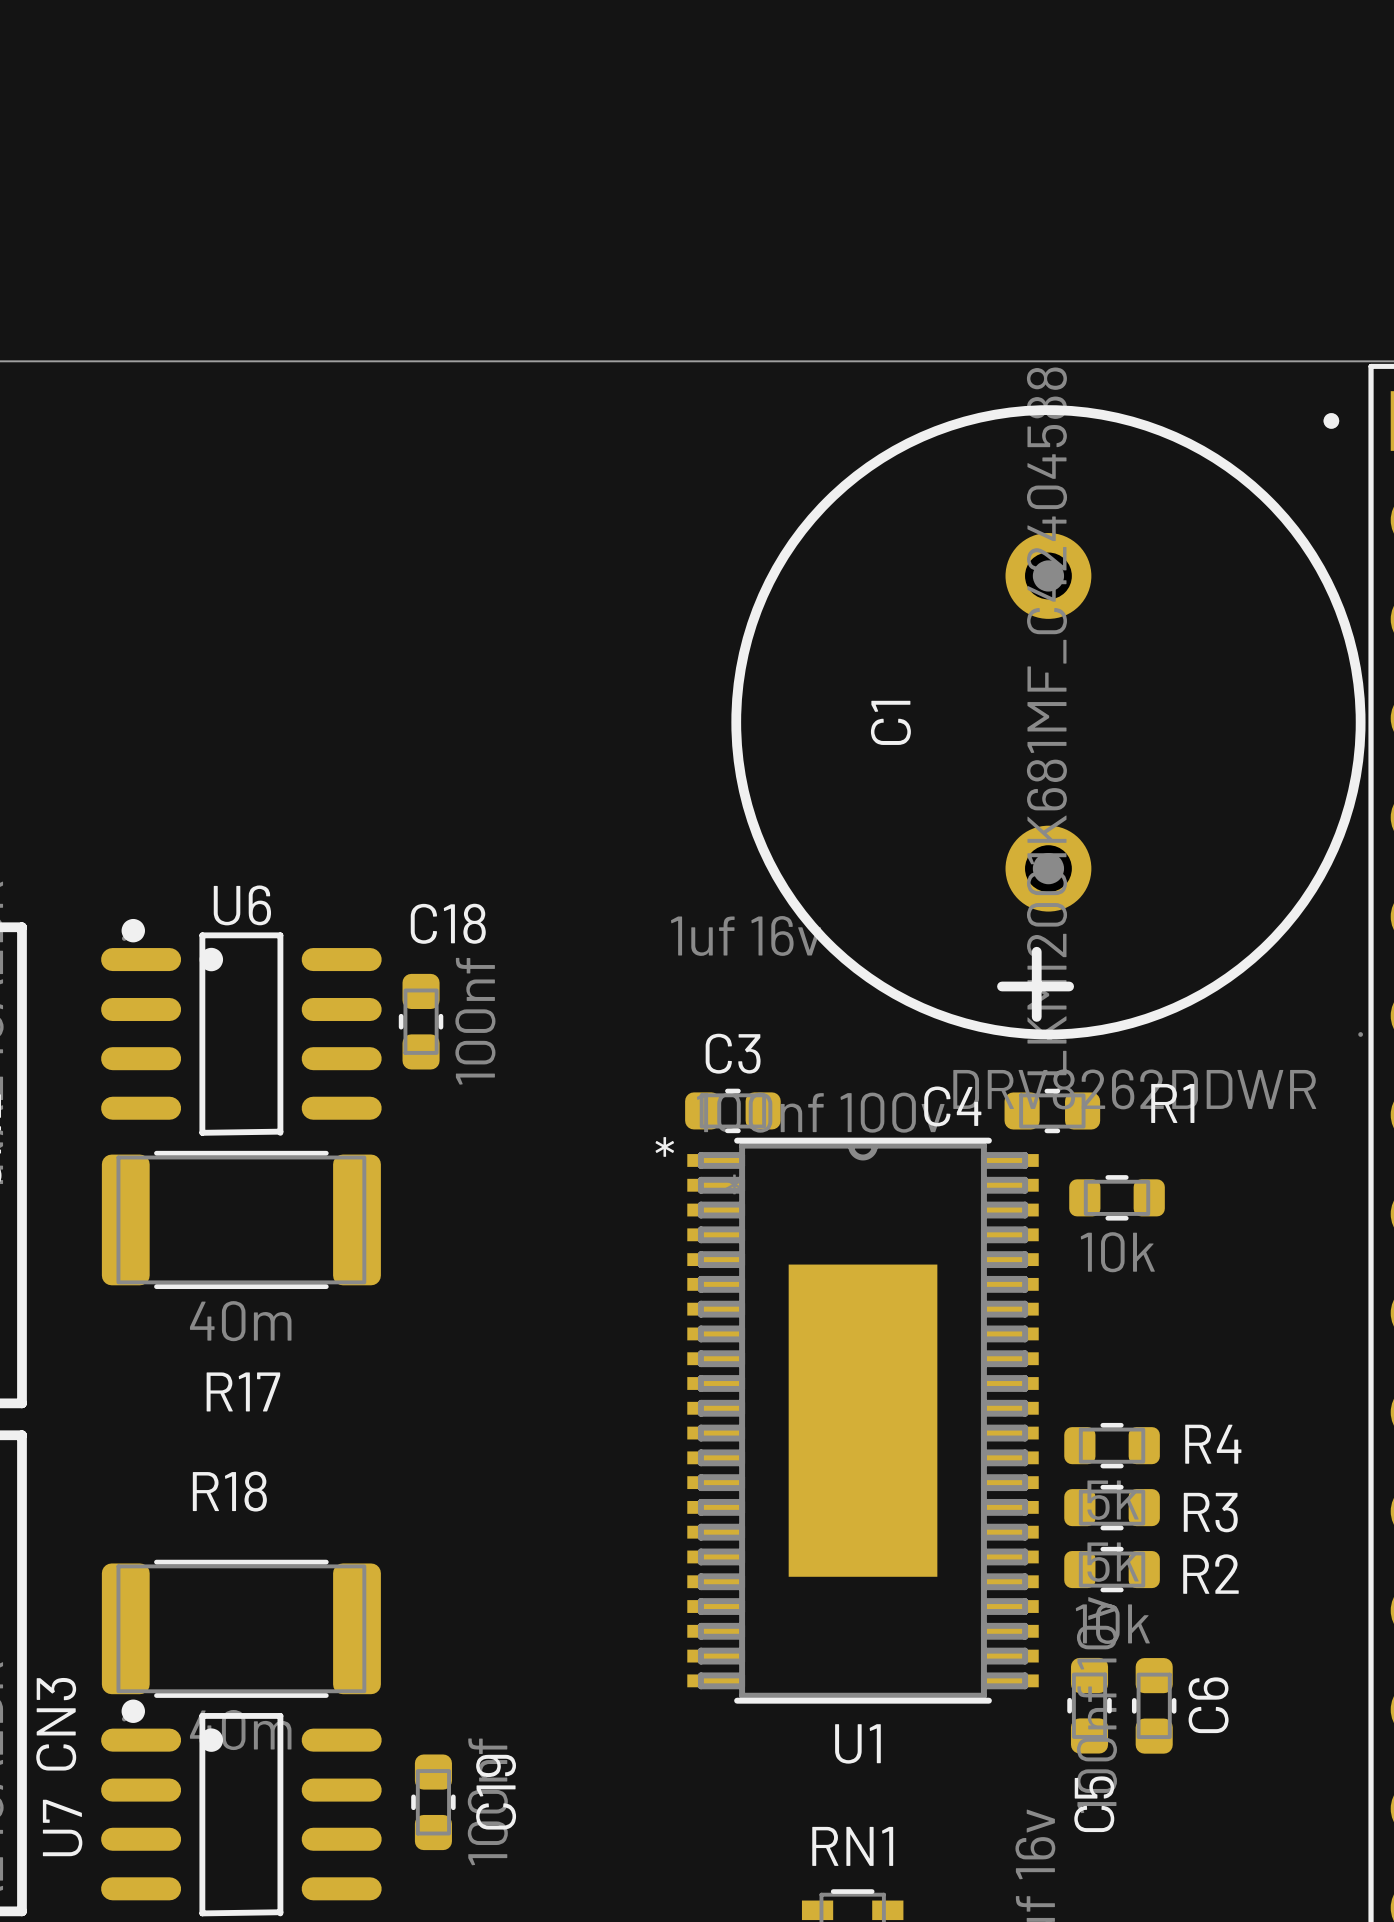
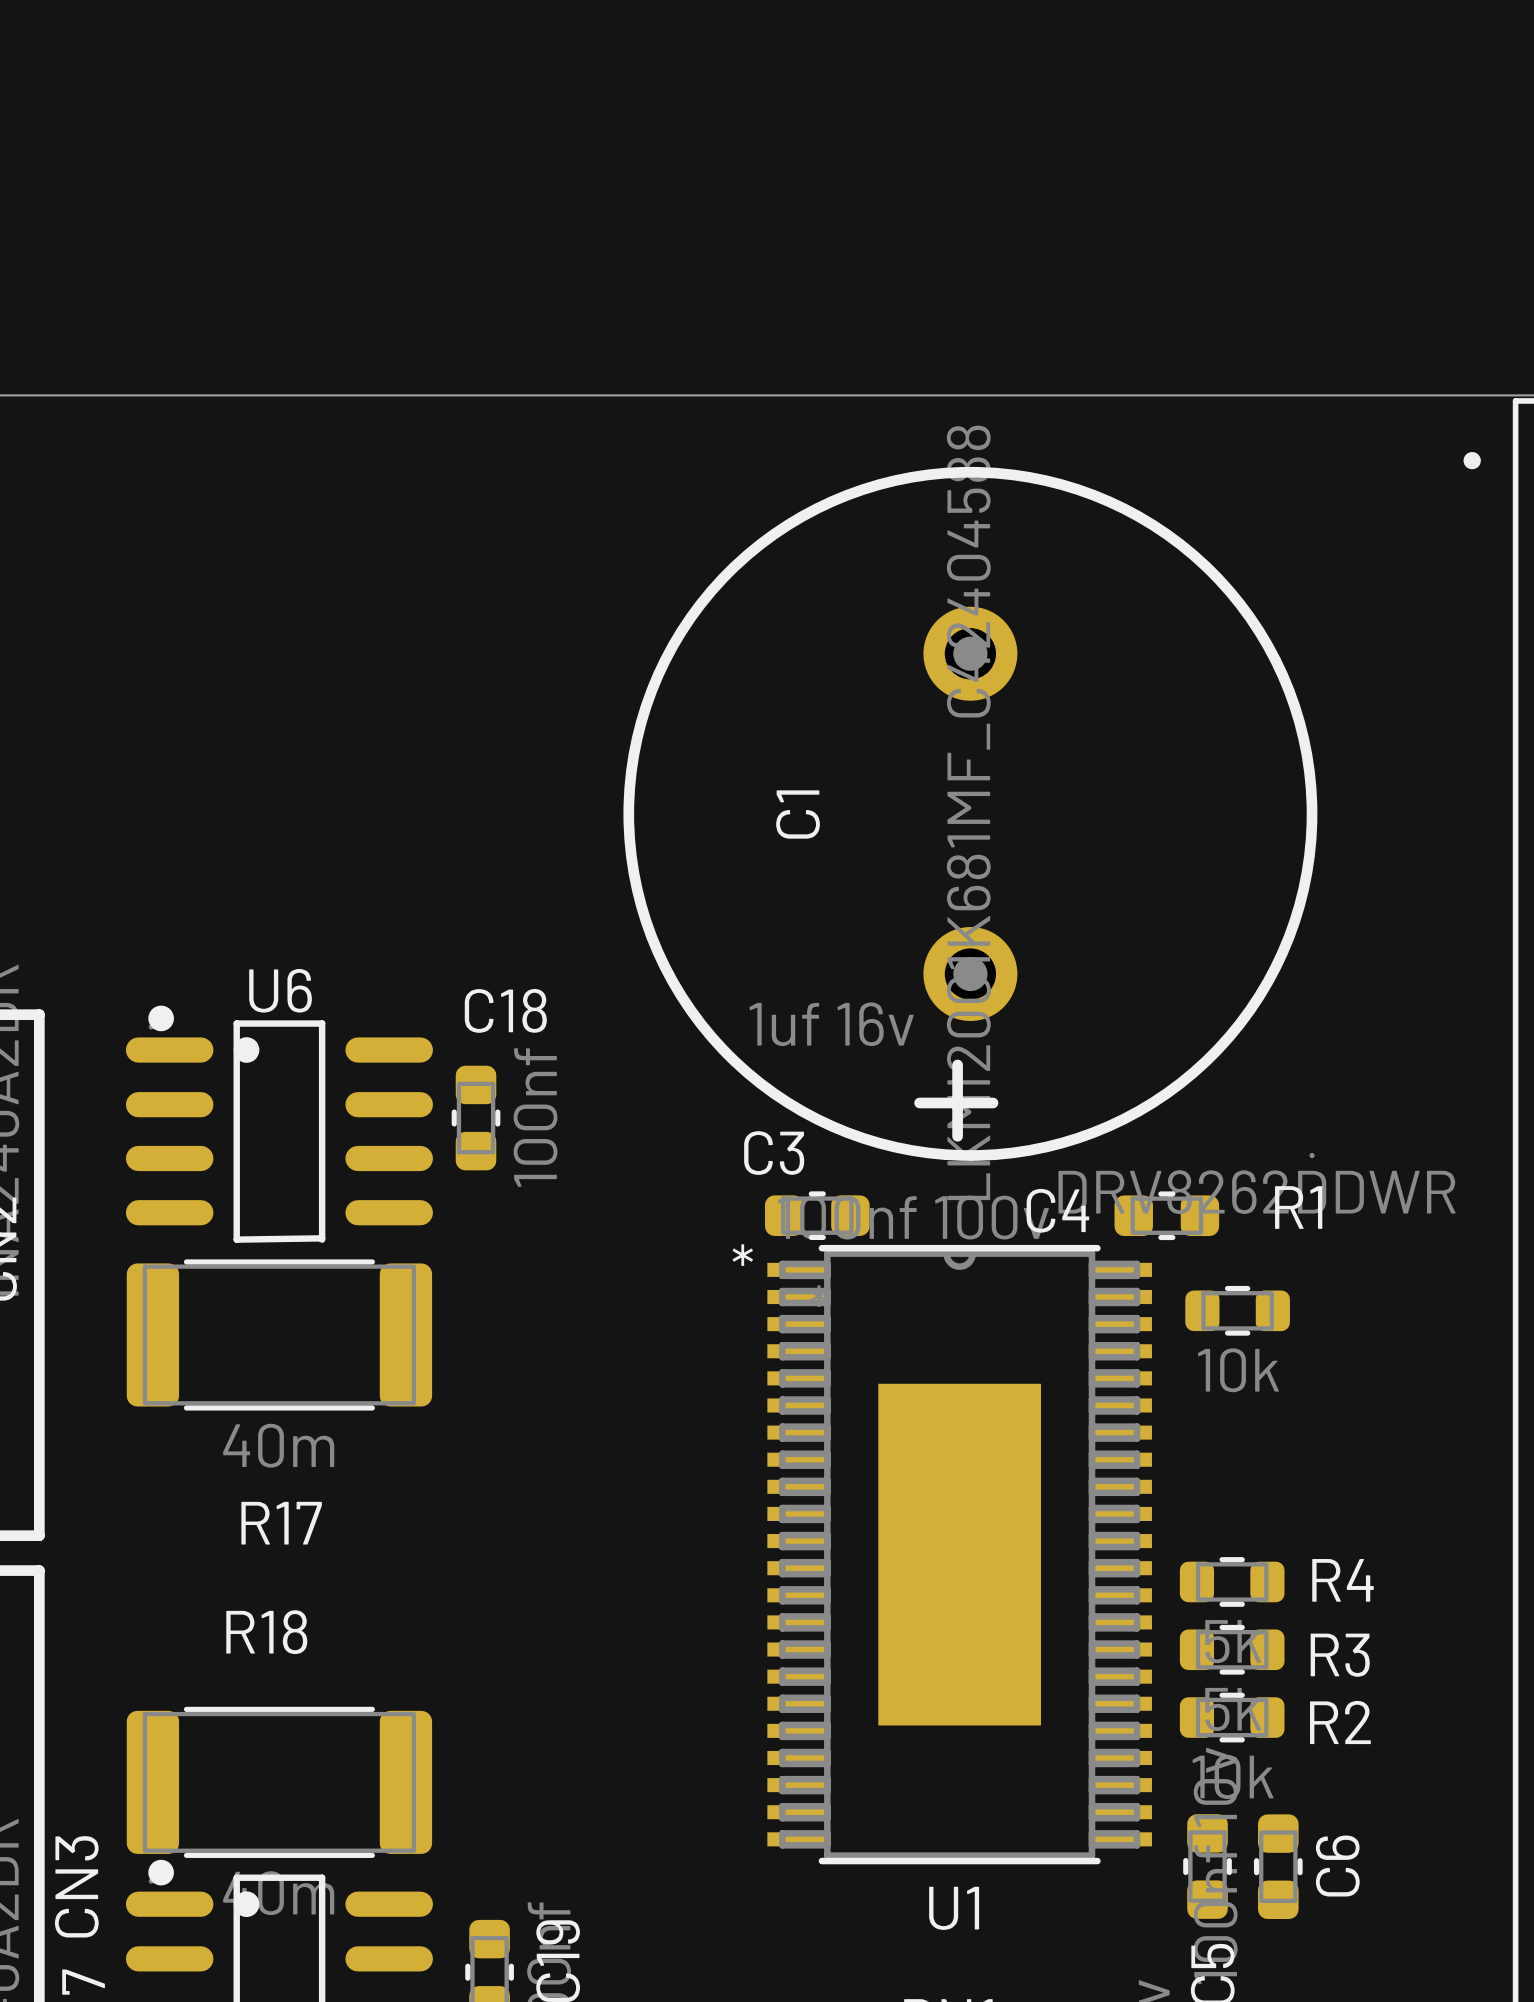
C1 position: (1048, 722) -> (970, 813)
C3 name position: C3 (733, 1053) -> C3 (774, 1153)

